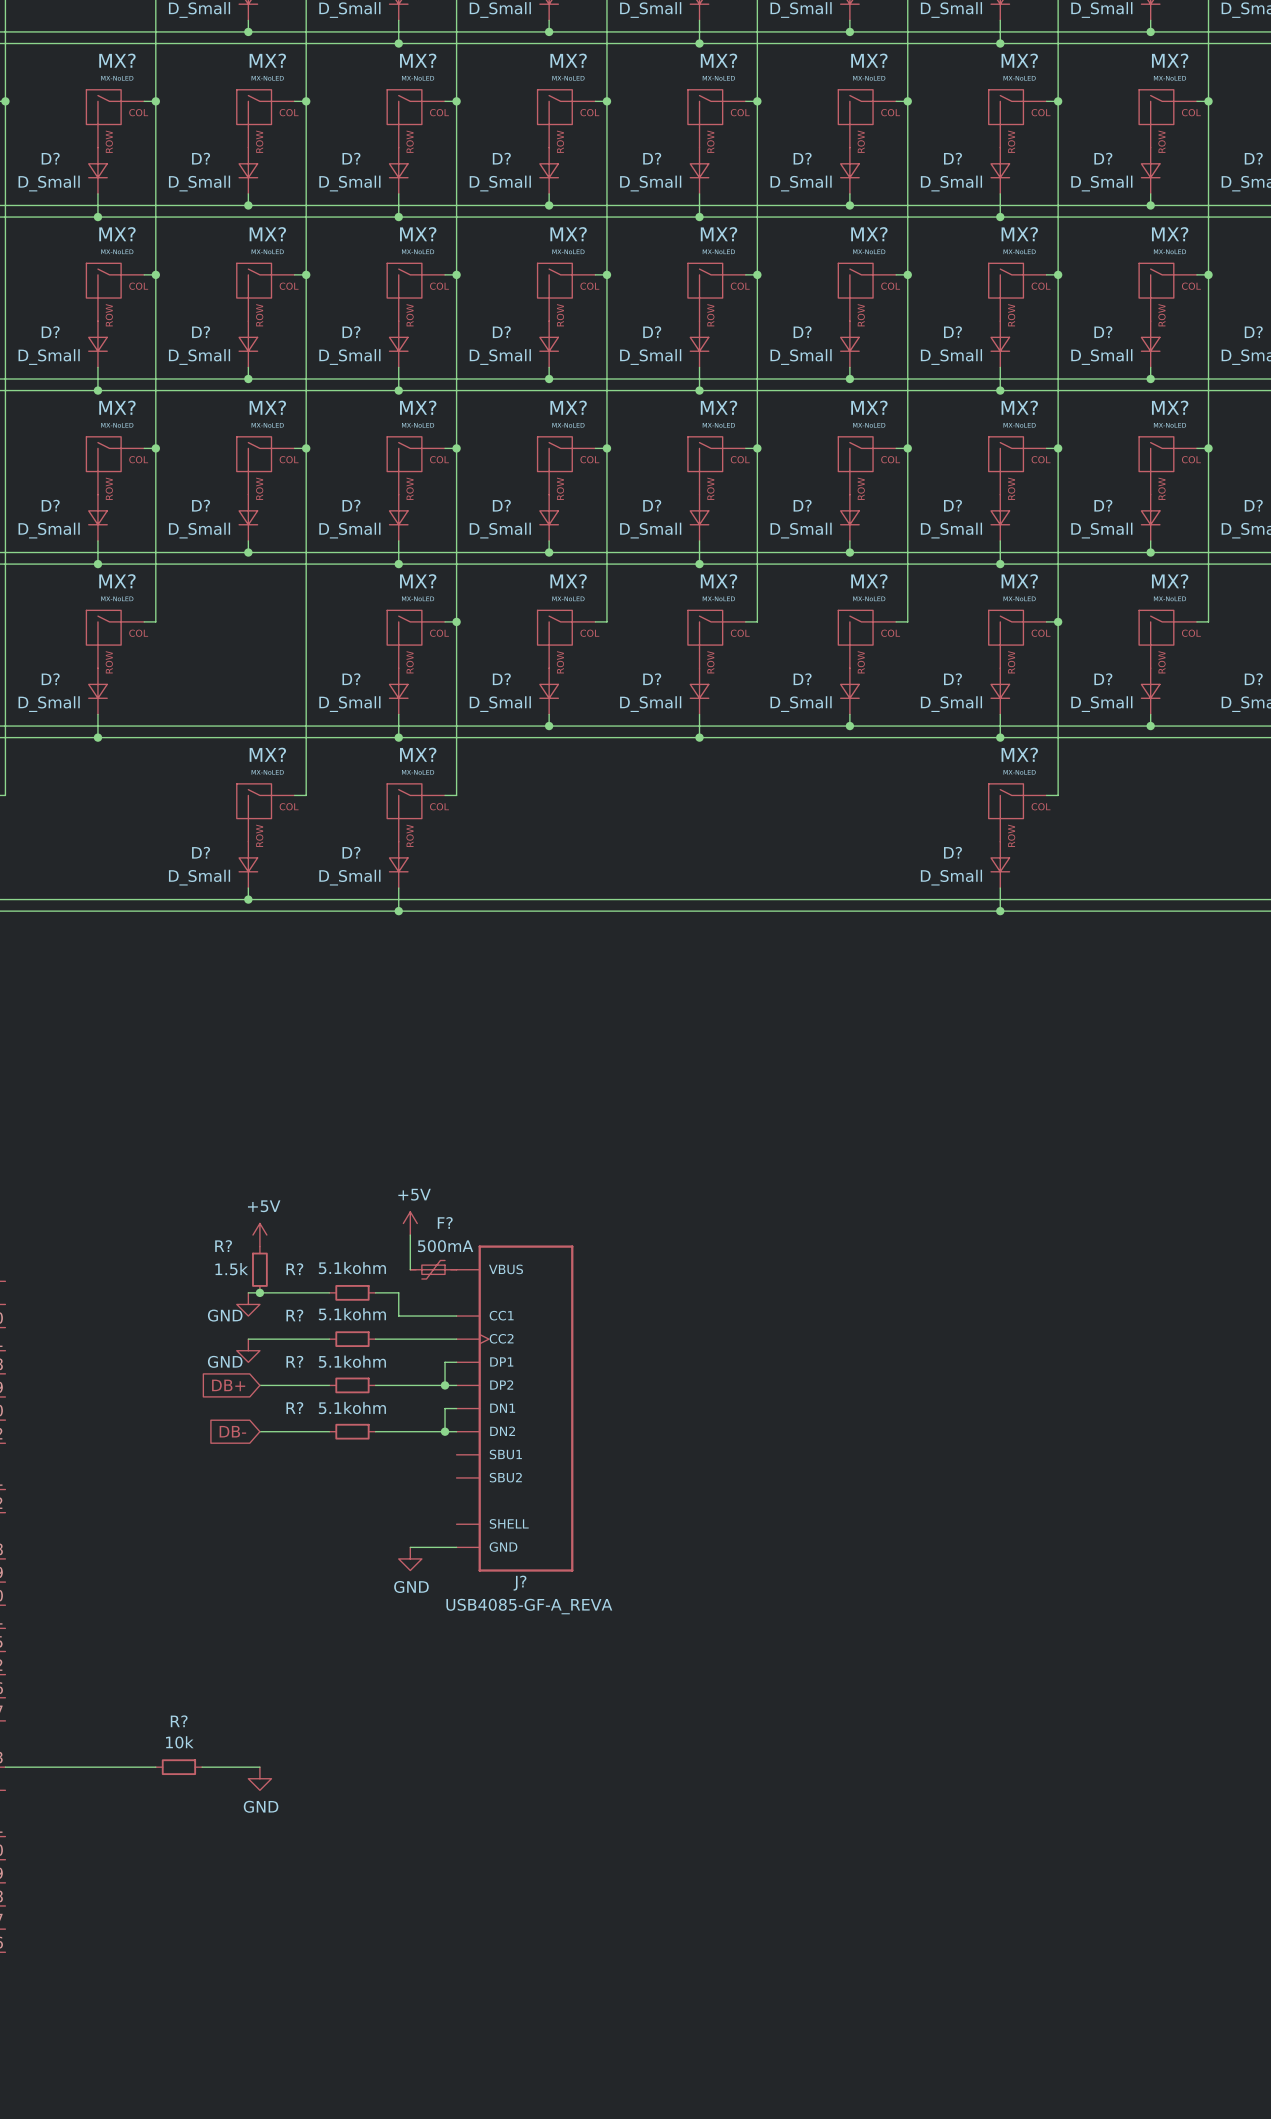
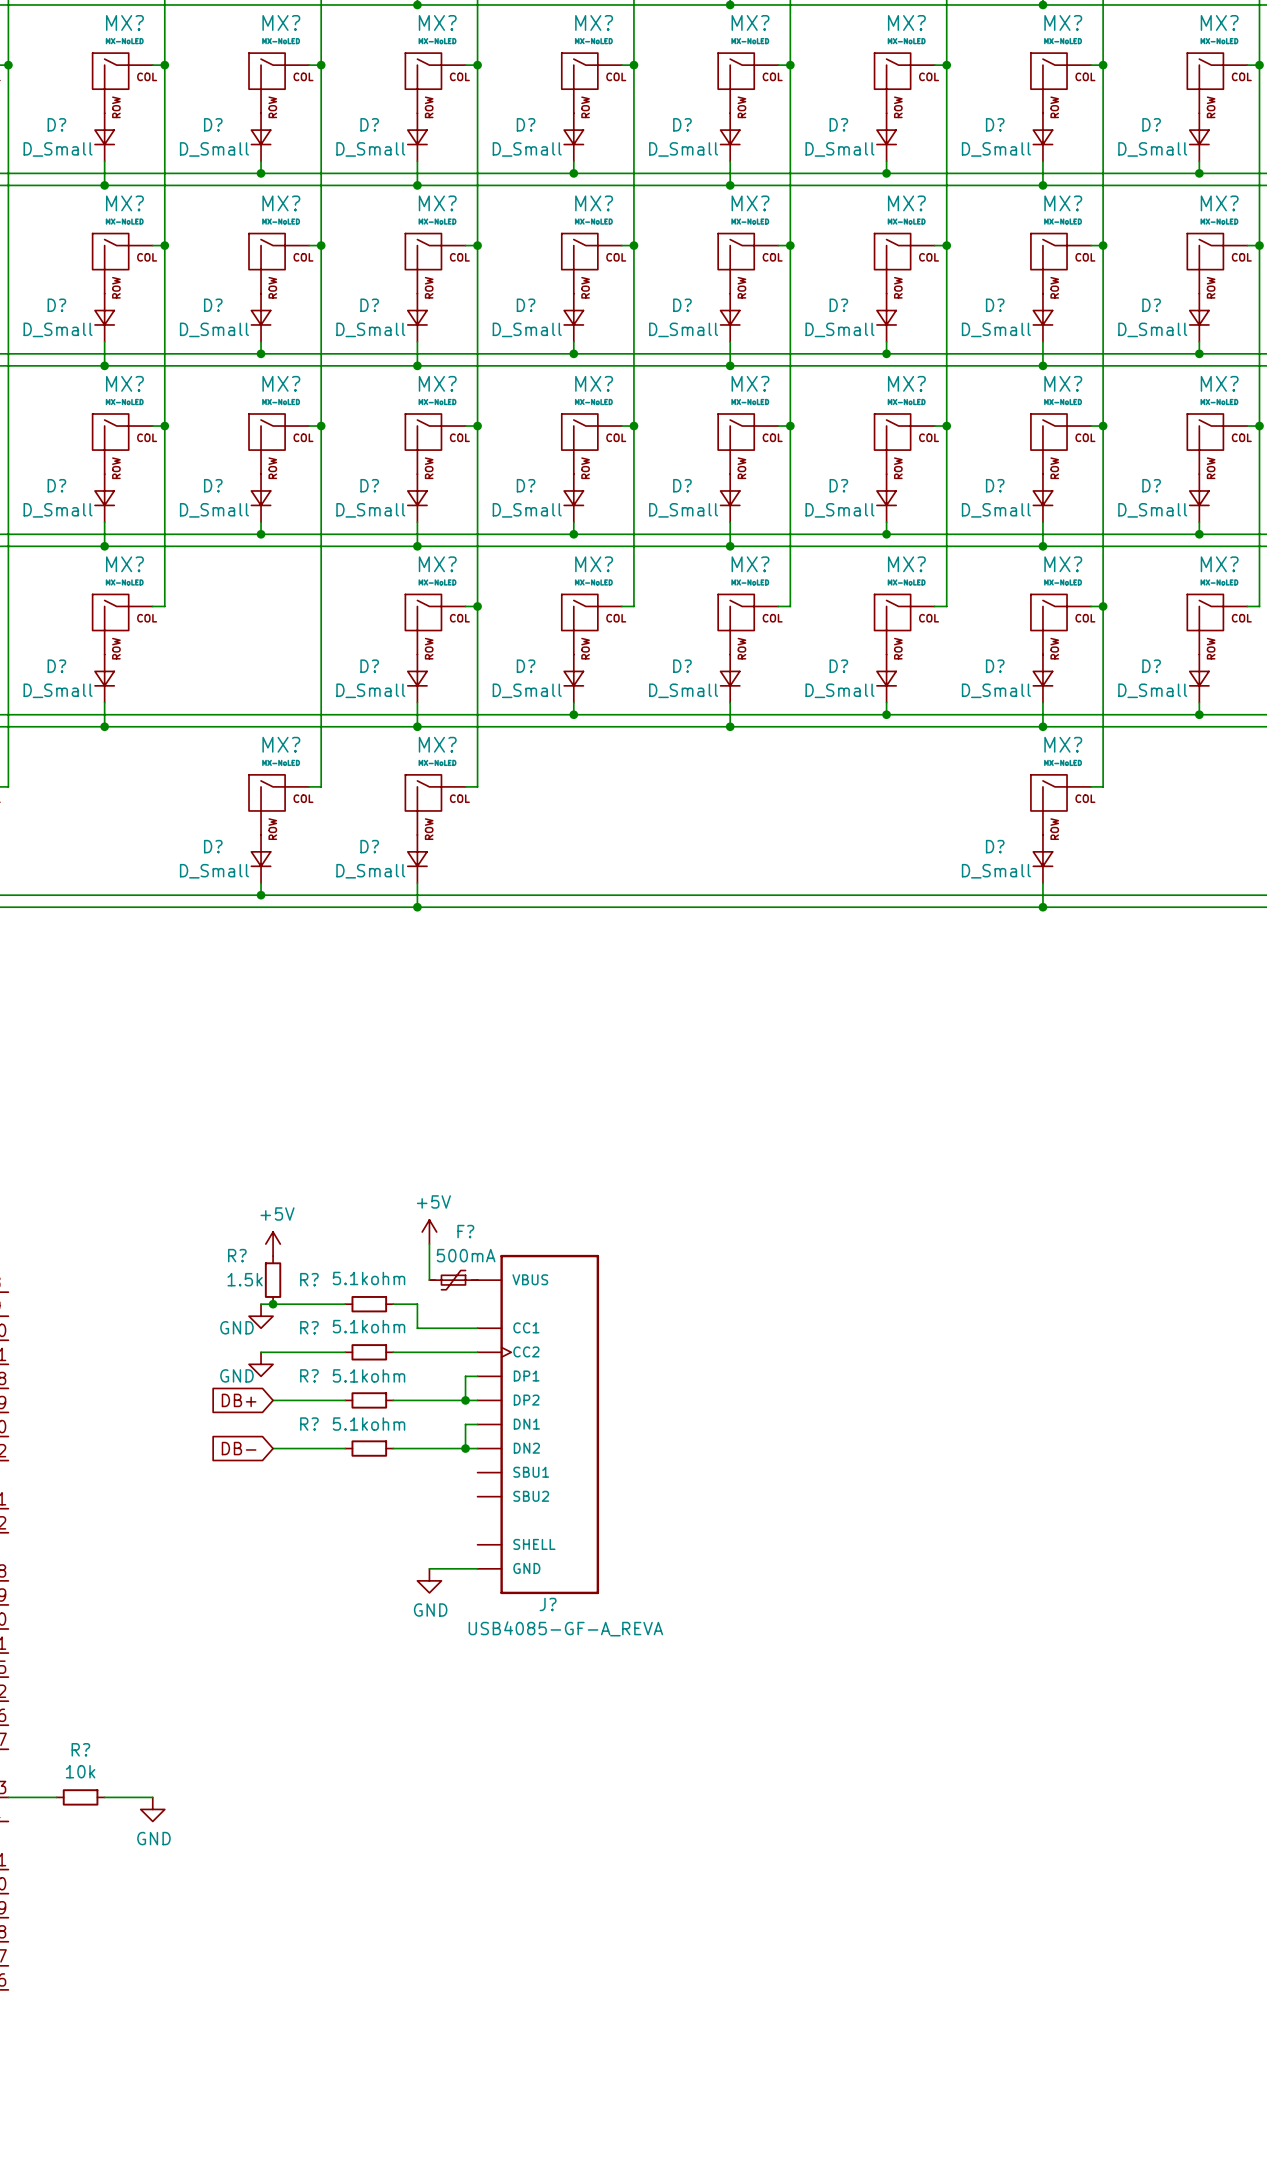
wire: (51, 1767) (97, 1767) -> none
wire: (144, 1767) (155, 1767) -> none
R? position: (178, 1767) -> (80, 1797)
wire: (202, 1767) (259, 1767) -> none
power symbol position: GND (259, 1778) -> GND (152, 1809)

